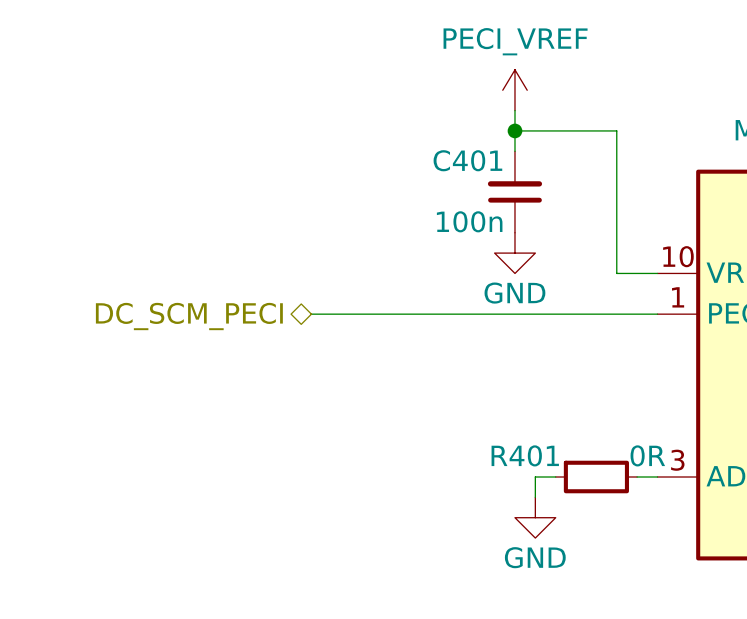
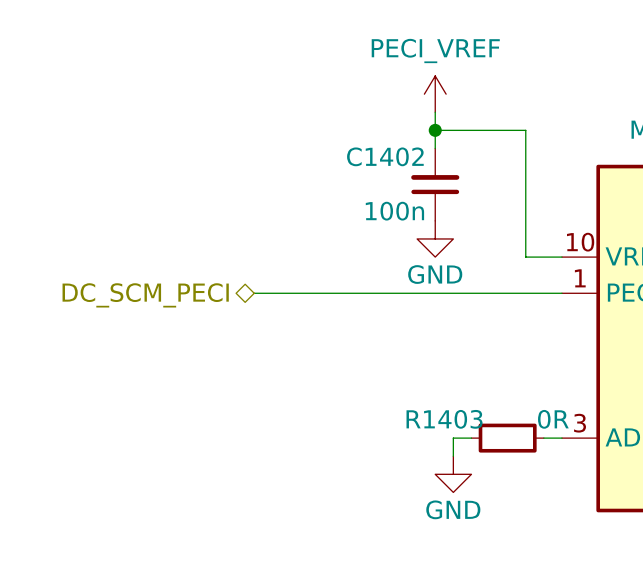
C401 name: C401 (467, 160) -> C1402 (385, 156)
R401 name: R401 (525, 455) -> R1403 (444, 419)

